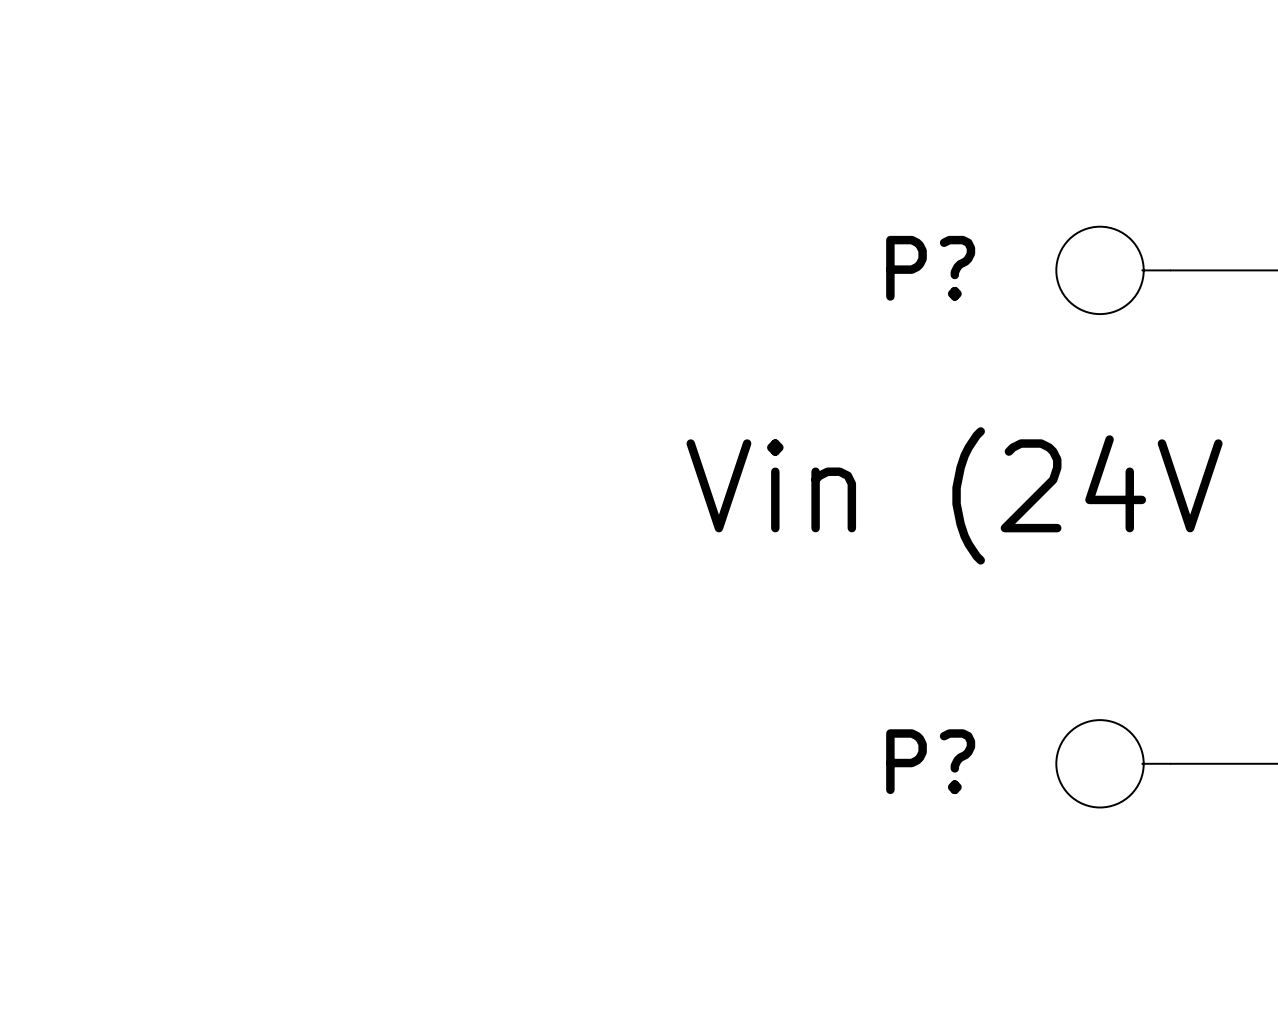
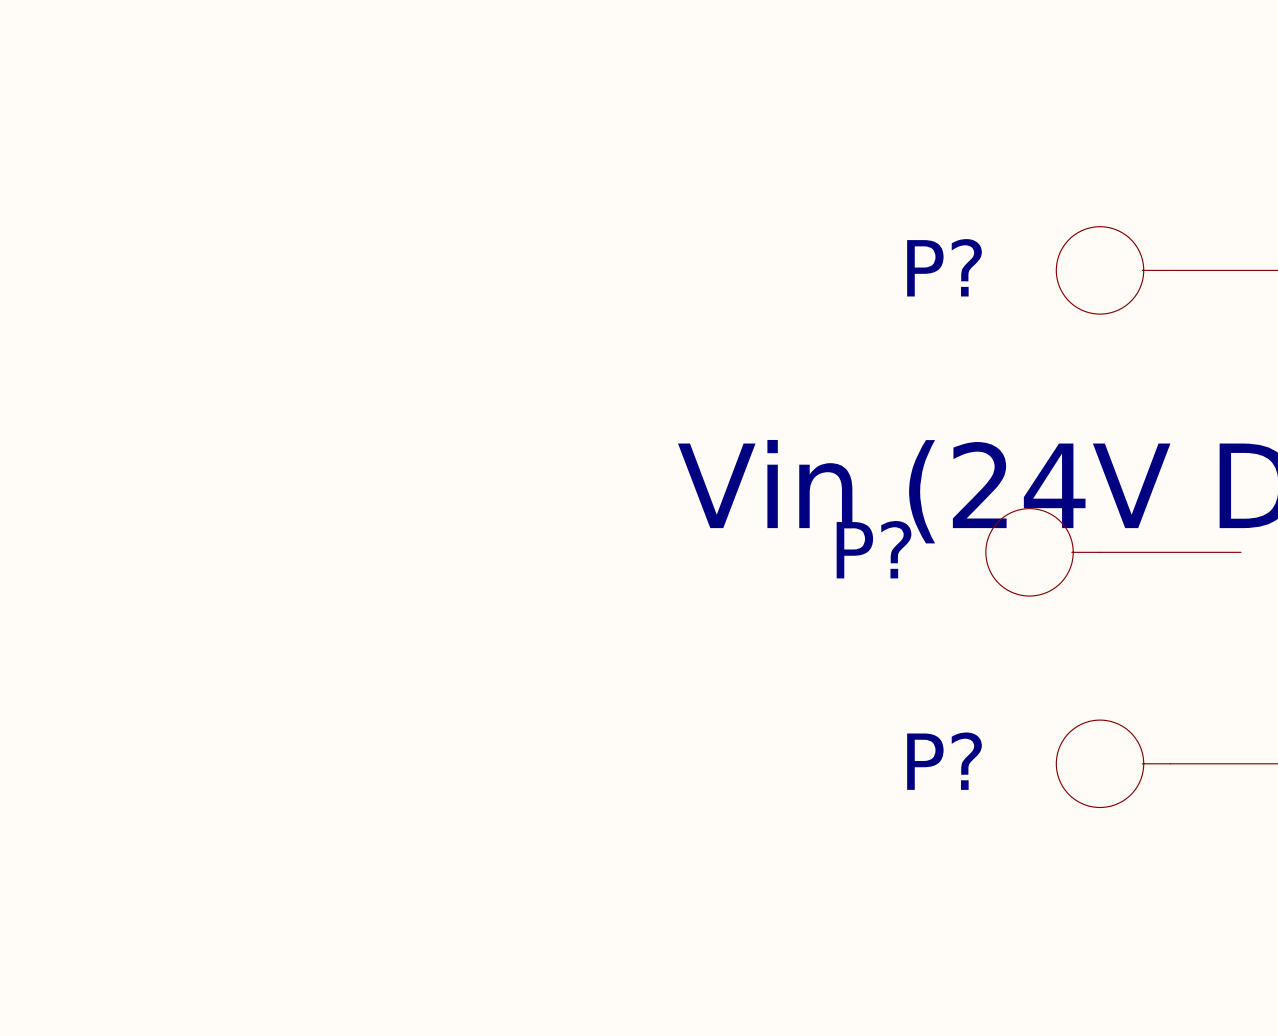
P?: none -> (1113, 552)

